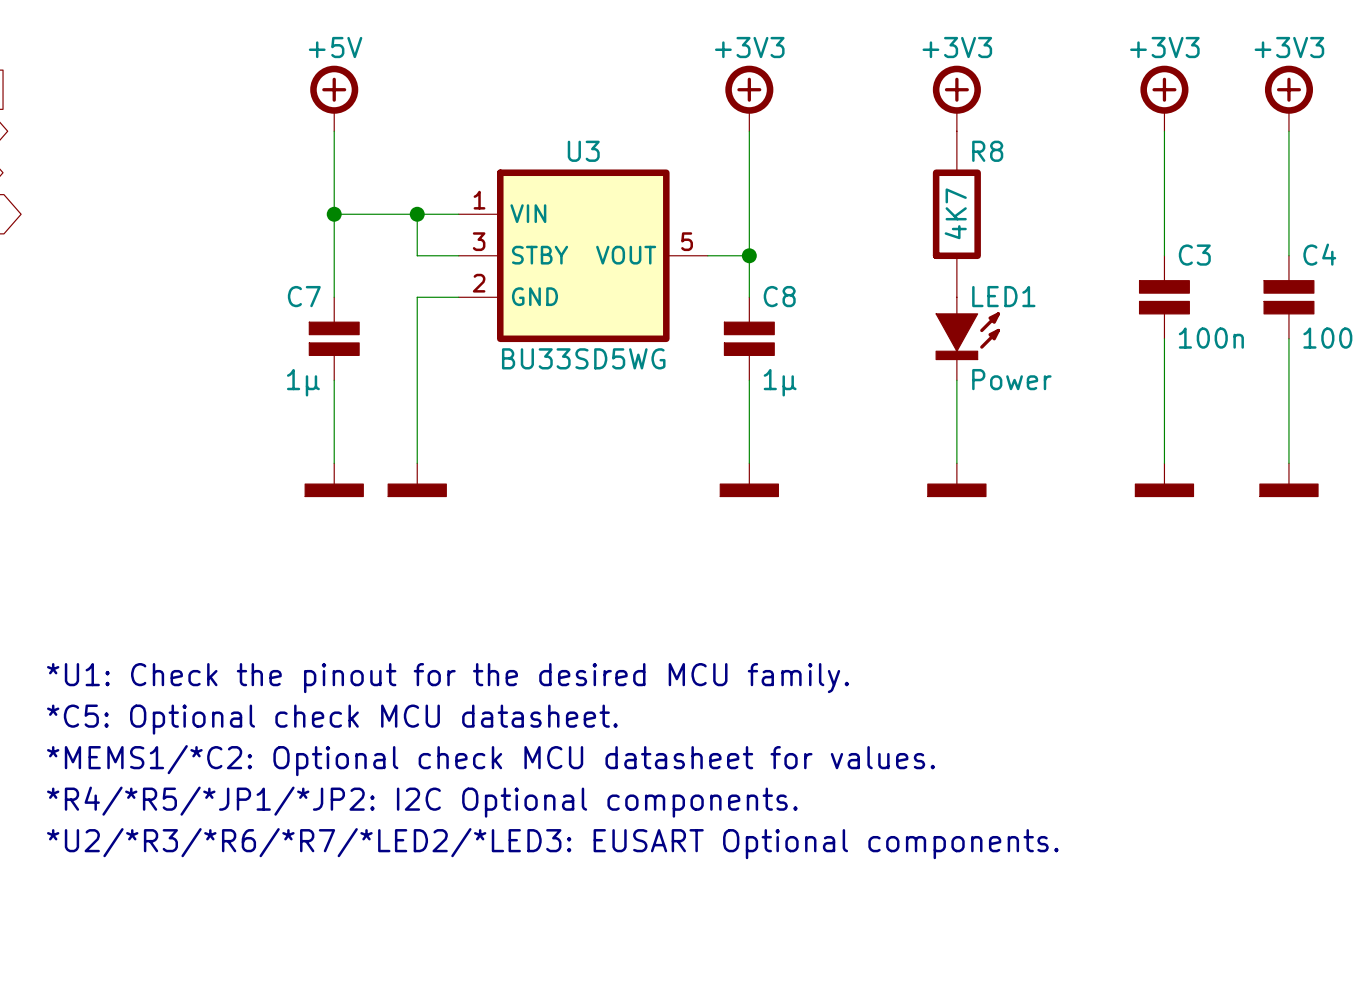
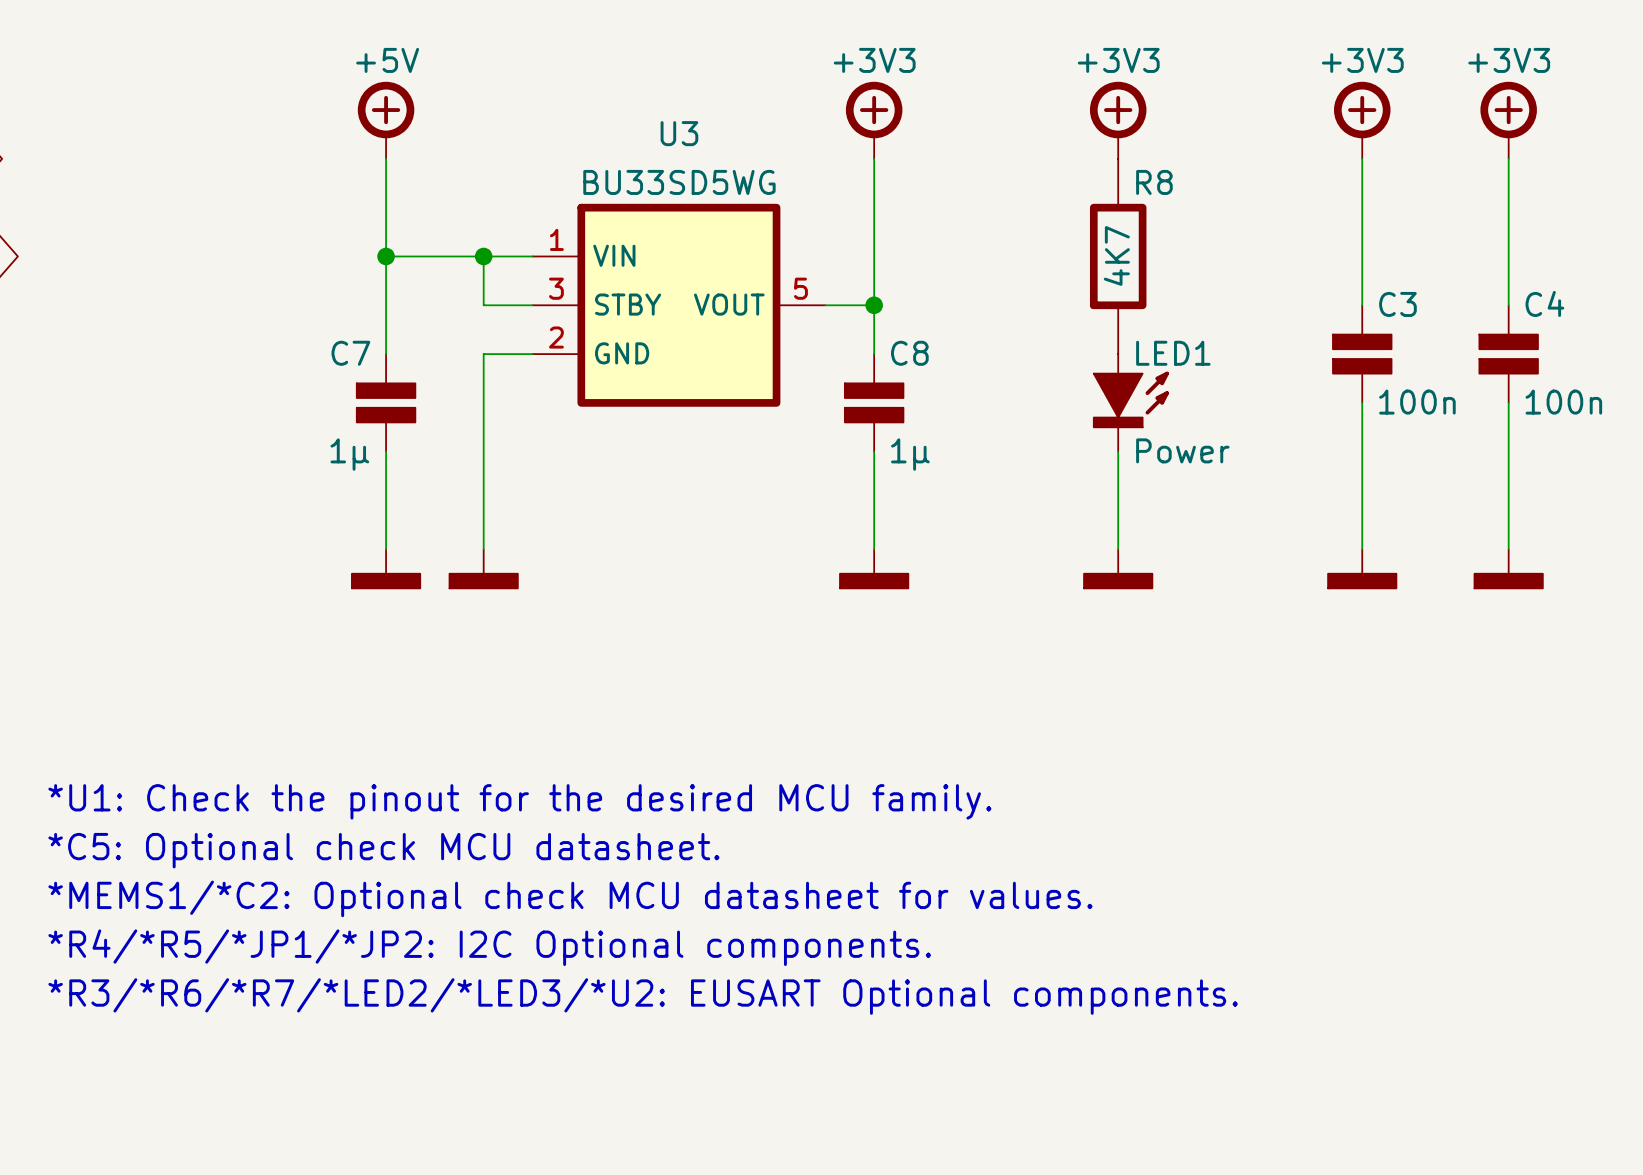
U3 name position: U3 (583, 151) -> U3 (679, 133)
U3 value position: BU33SD5WG (583, 358) -> BU33SD5WG (679, 182)
text: *U2/*R3/*R6/*R7/*LED2/*LED3: EUSART Optional components. (552, 843) -> *R3/*R6/*R7/*LED2/*LED3/*U2: EUSART Optional components. (643, 996)

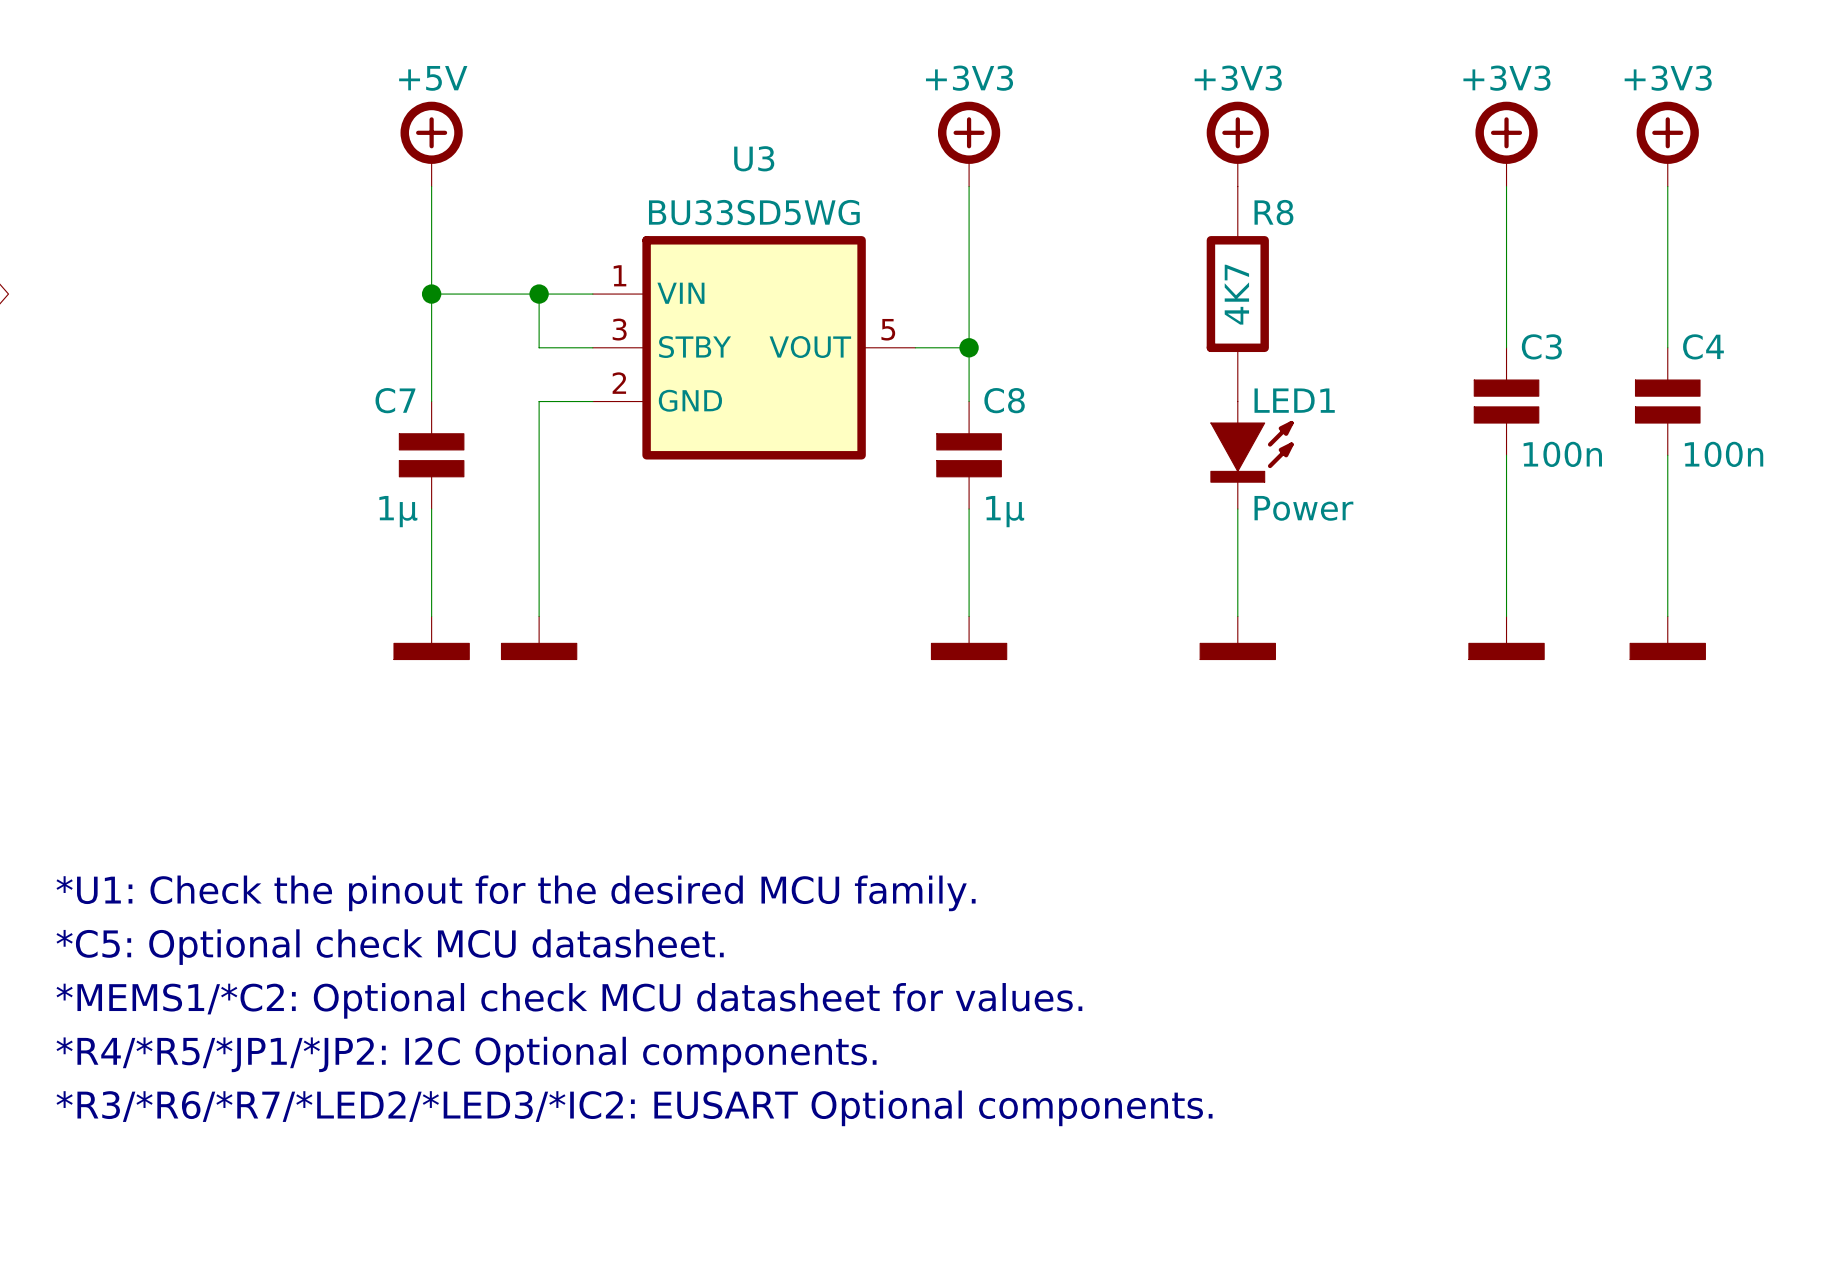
text: *R3/*R6/*R7/*LED2/*LED3/*U2: EUSART Optional components. (643, 996) -> *R3/*R6/*R7/*LED2/*LED3/*IC2: EUSART Optional components. (634, 1108)

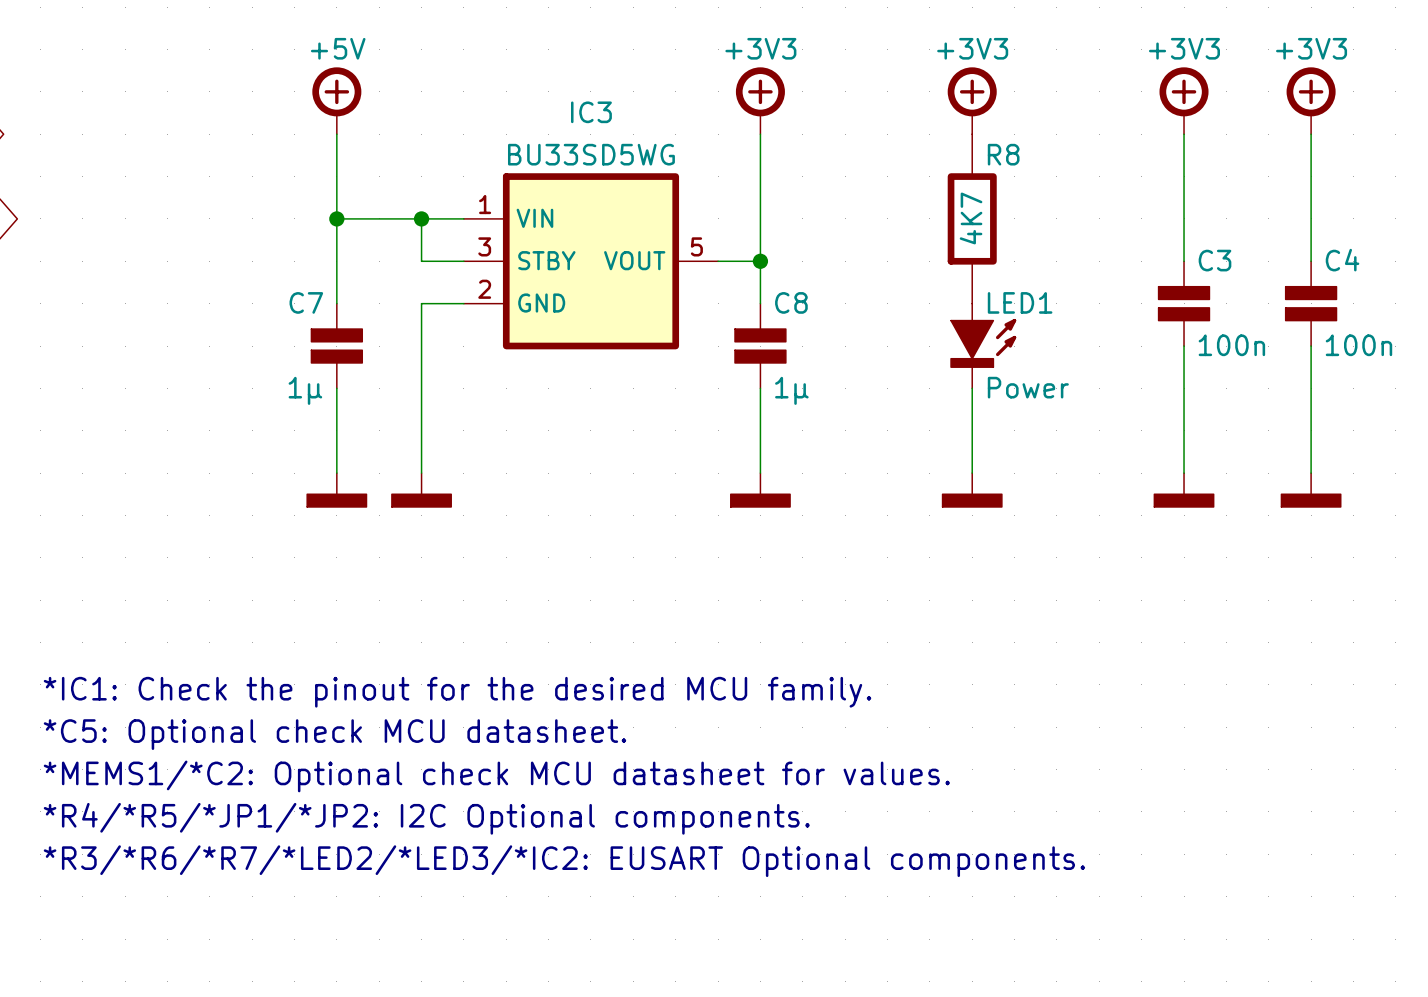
U3 name: U3 (754, 158) -> IC3 (591, 112)
text: *U1: Check the pinout for the desired MCU family. (516, 893) -> *IC1: Check the pinout for the desired MCU family. (457, 692)

